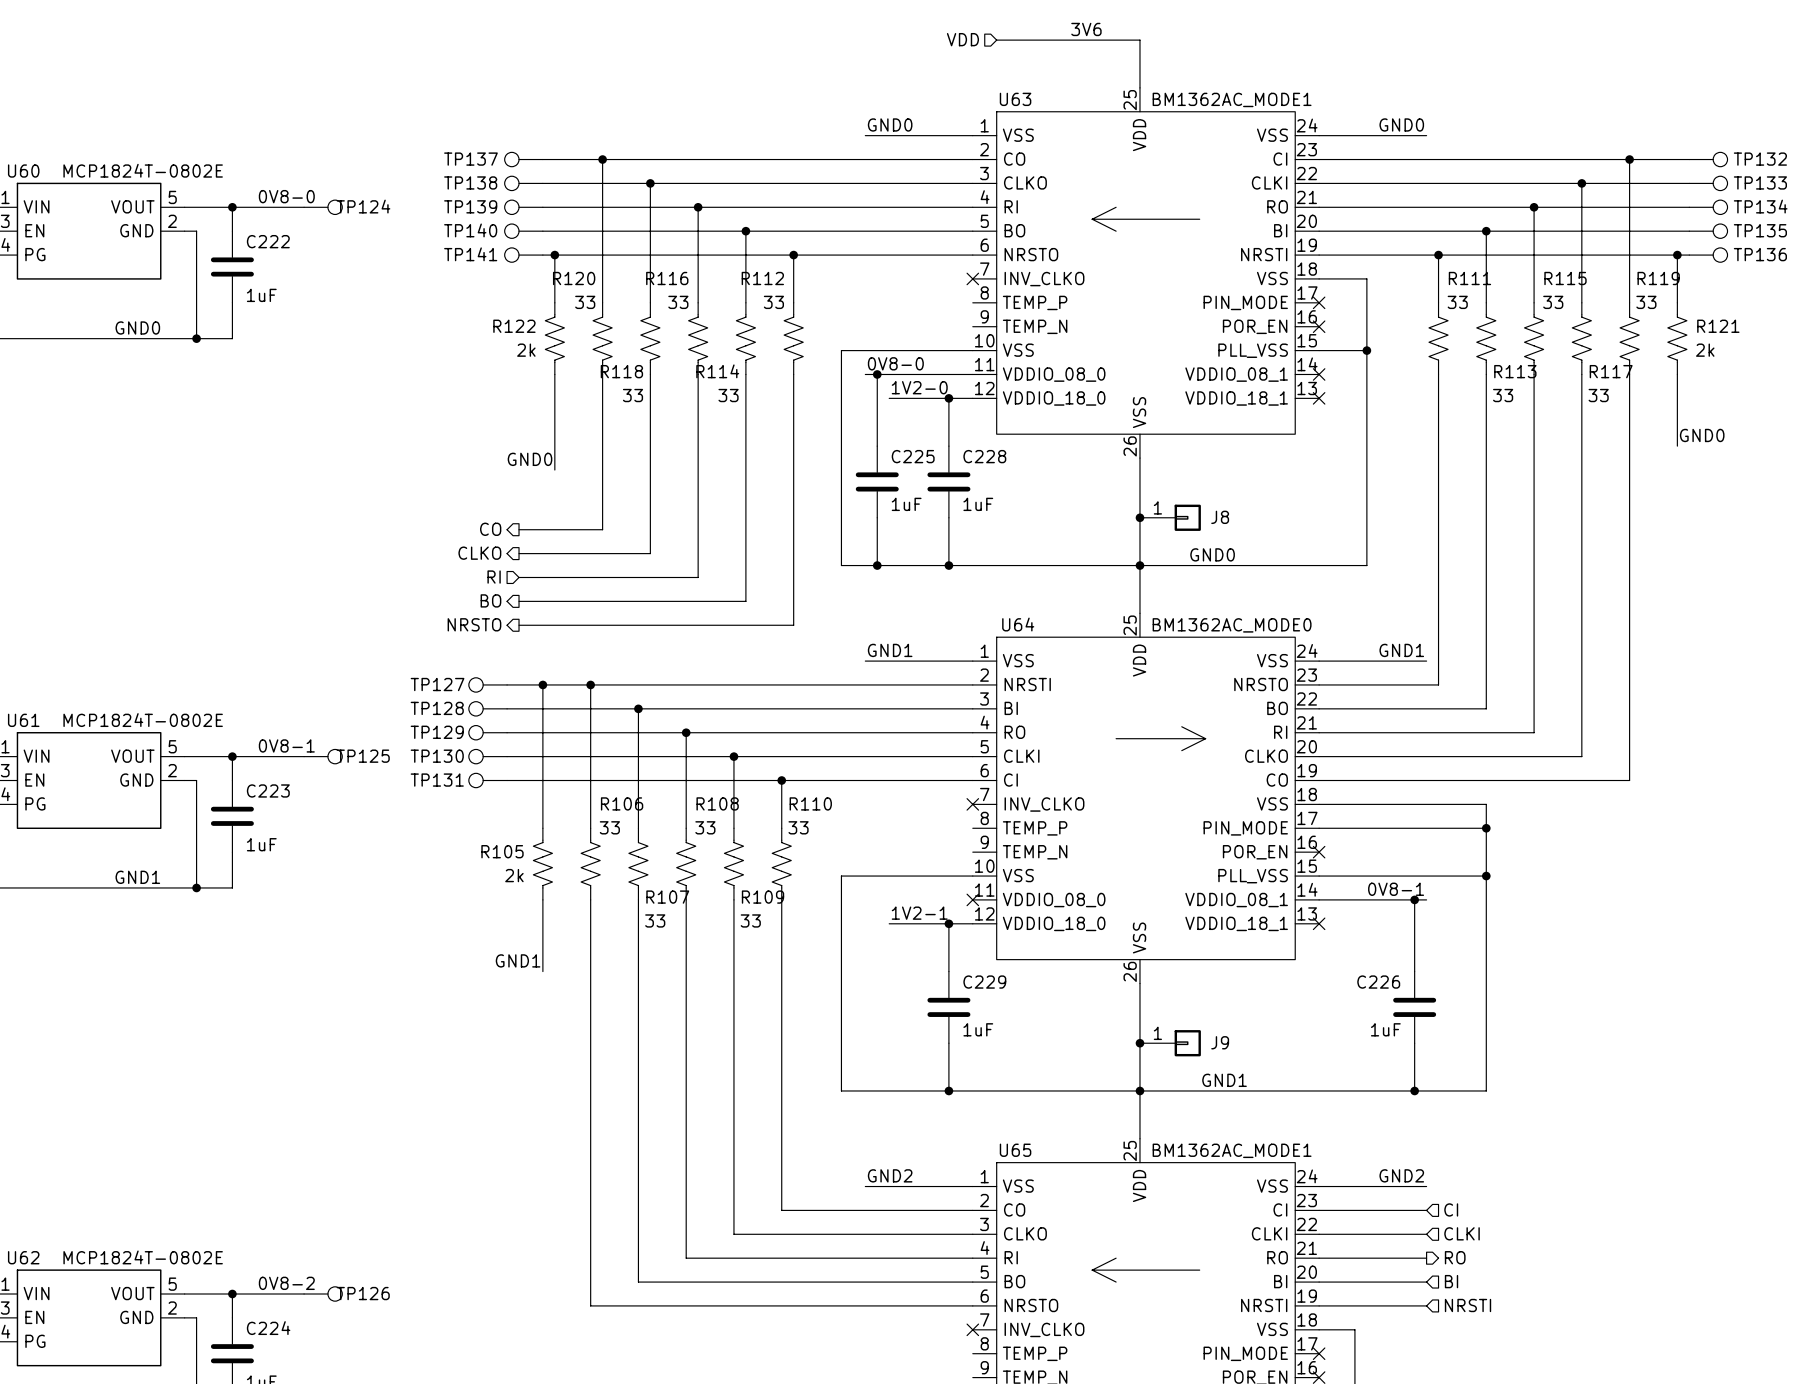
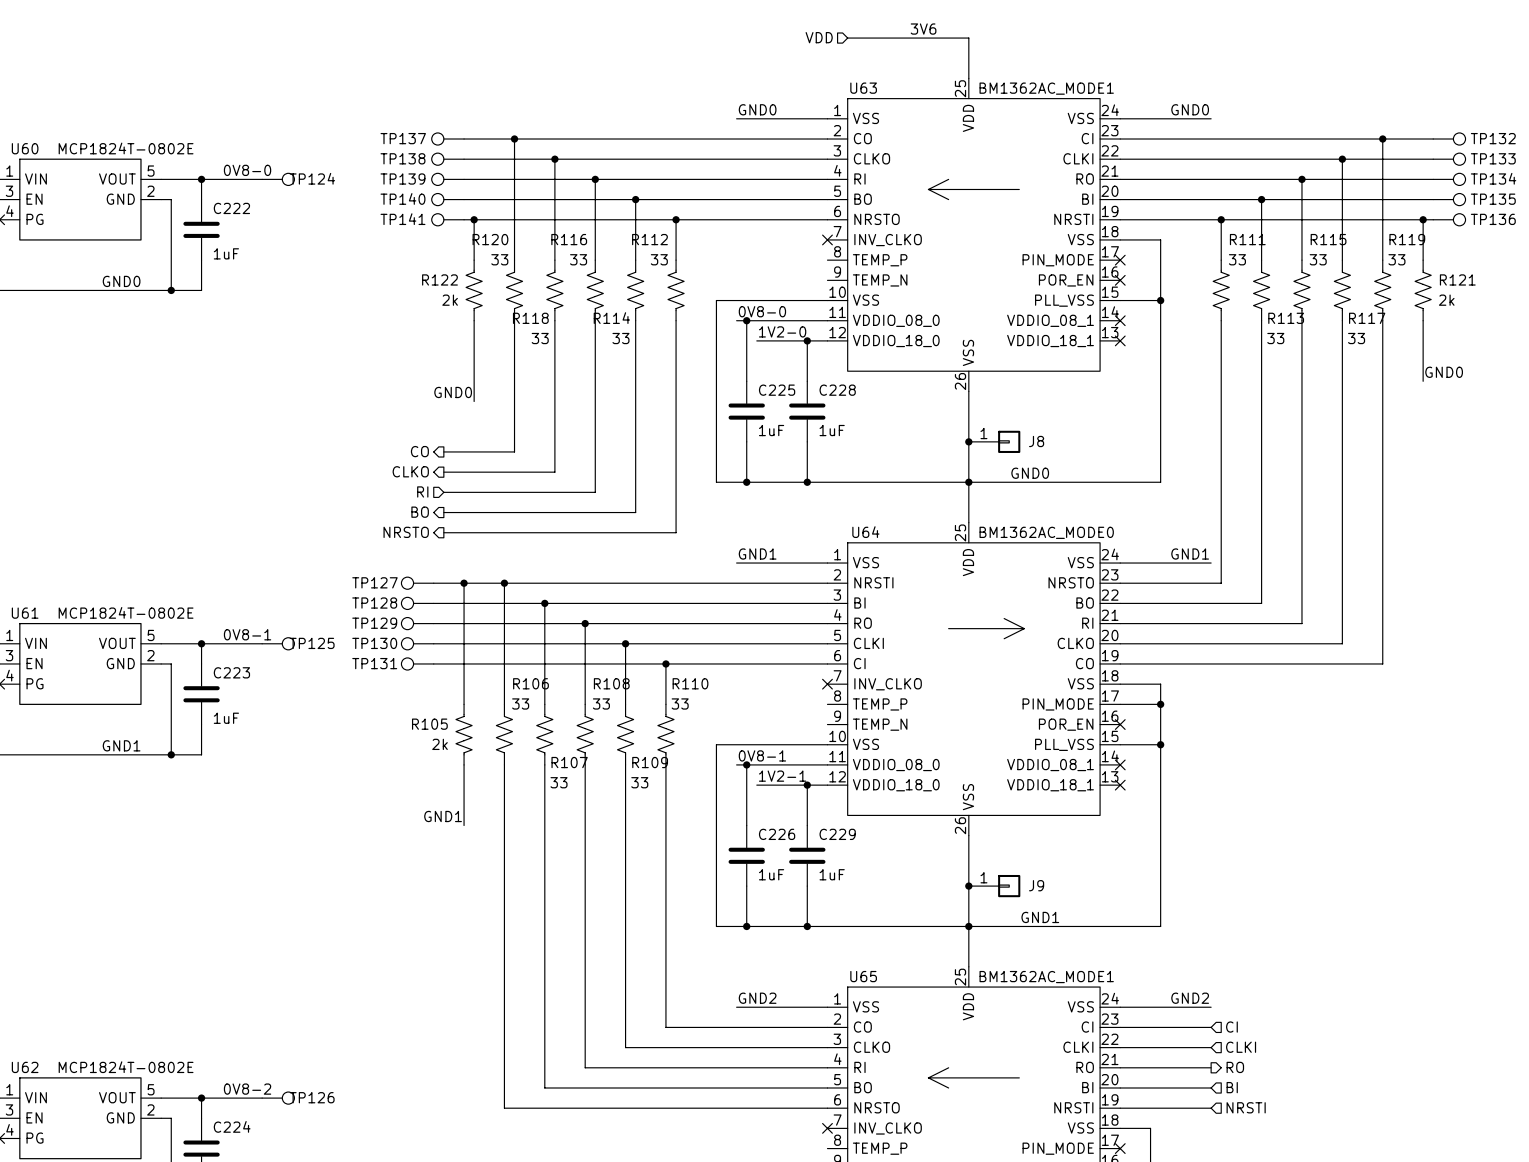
wire: (1366, 804) (1486, 804) (1486, 1090) (1366, 1090) -> (1160, 684) (1160, 926)
wire: (1366, 828) (1486, 828) -> none
junction: none -> (1160, 704)
junction: (1486, 828) -> none
wire: (1366, 876) (1486, 876) -> none
junction: none -> (1160, 744)
junction: (1486, 876) -> none
label: none -> 0V8-1 (762, 755)
label: 0V8-1 (1396, 889) -> none
wire: none -> (736, 764) (827, 764)
wire: none -> (746, 764) (746, 825)
junction: none -> (746, 764)
no-connect mark: (972, 899) -> none
wire: (1319, 899) (1426, 899) -> none
no-connect mark: none -> (1120, 764)
wire: (1414, 899) (1414, 971) -> none
junction: (1414, 899) -> none
C226 name position: C226 (1378, 982) -> C226 (777, 834)
C226 position: (1414, 1007) -> (746, 855)
C226 value position: 1uF (1385, 1029) -> 1uF (771, 874)
wire: none -> (746, 886) (746, 926)
wire: (1414, 1043) (1414, 1090) -> none
junction: none -> (746, 926)
junction: (1414, 1090) -> none

